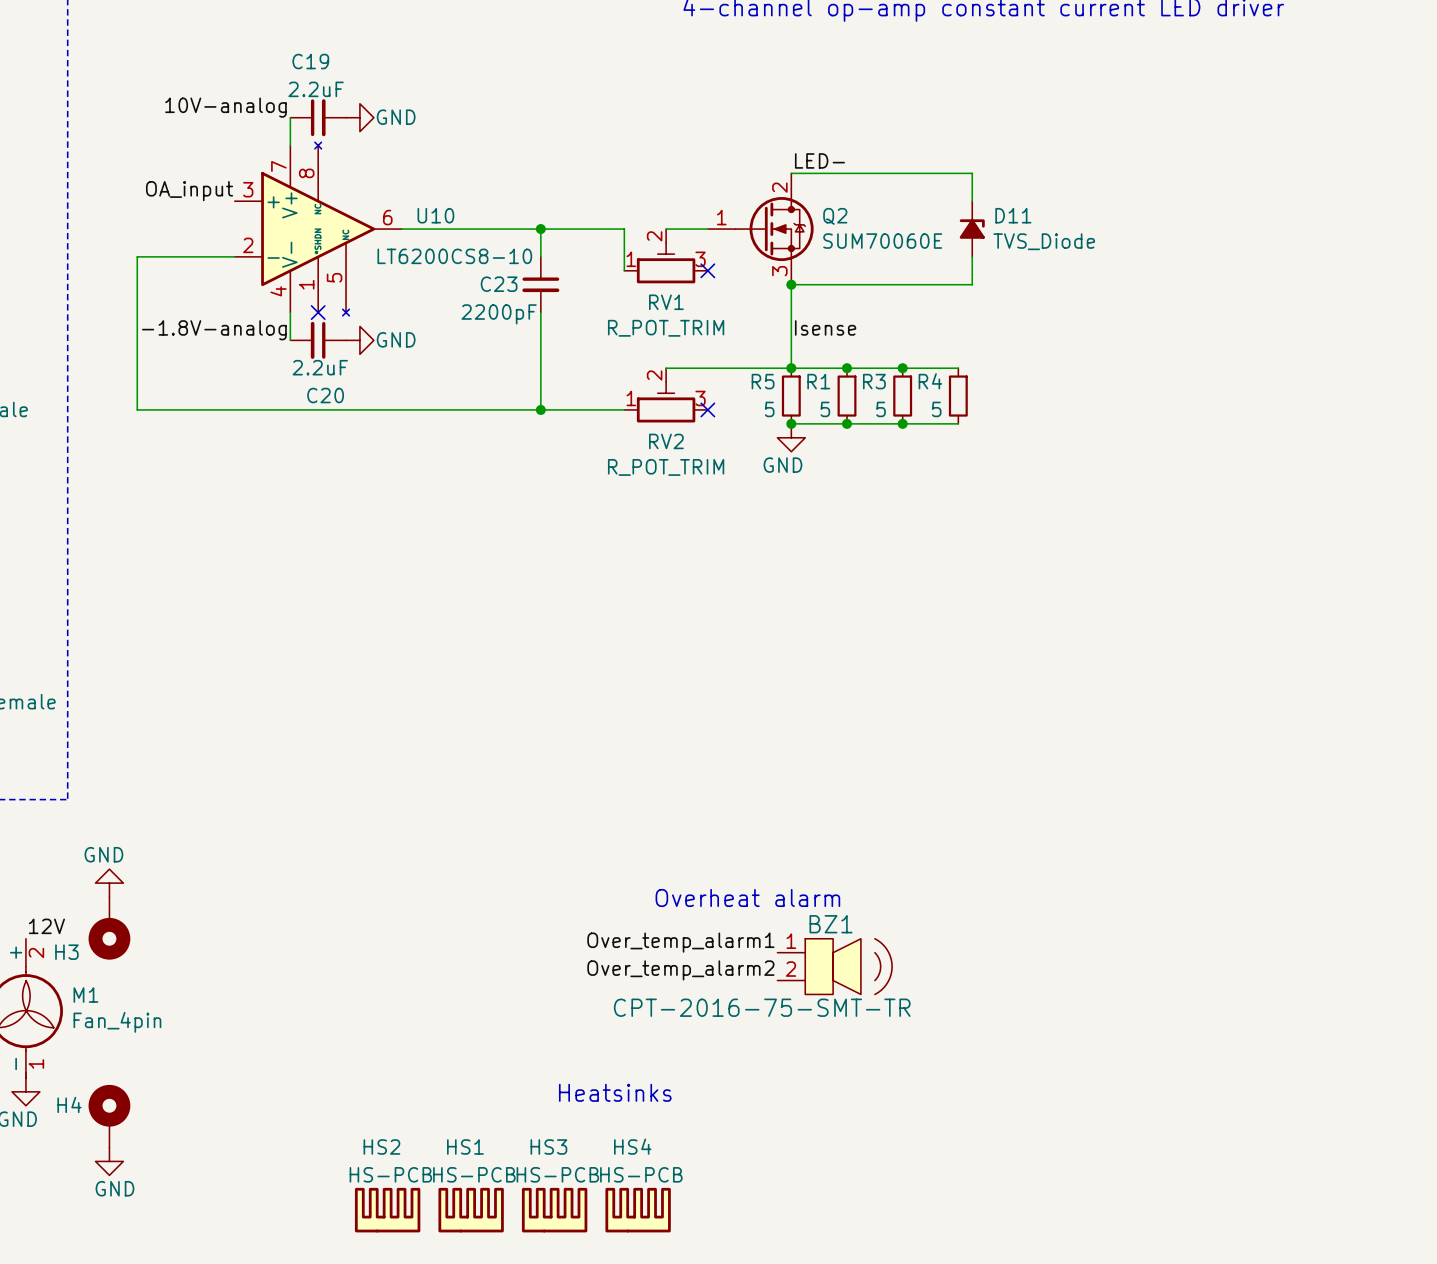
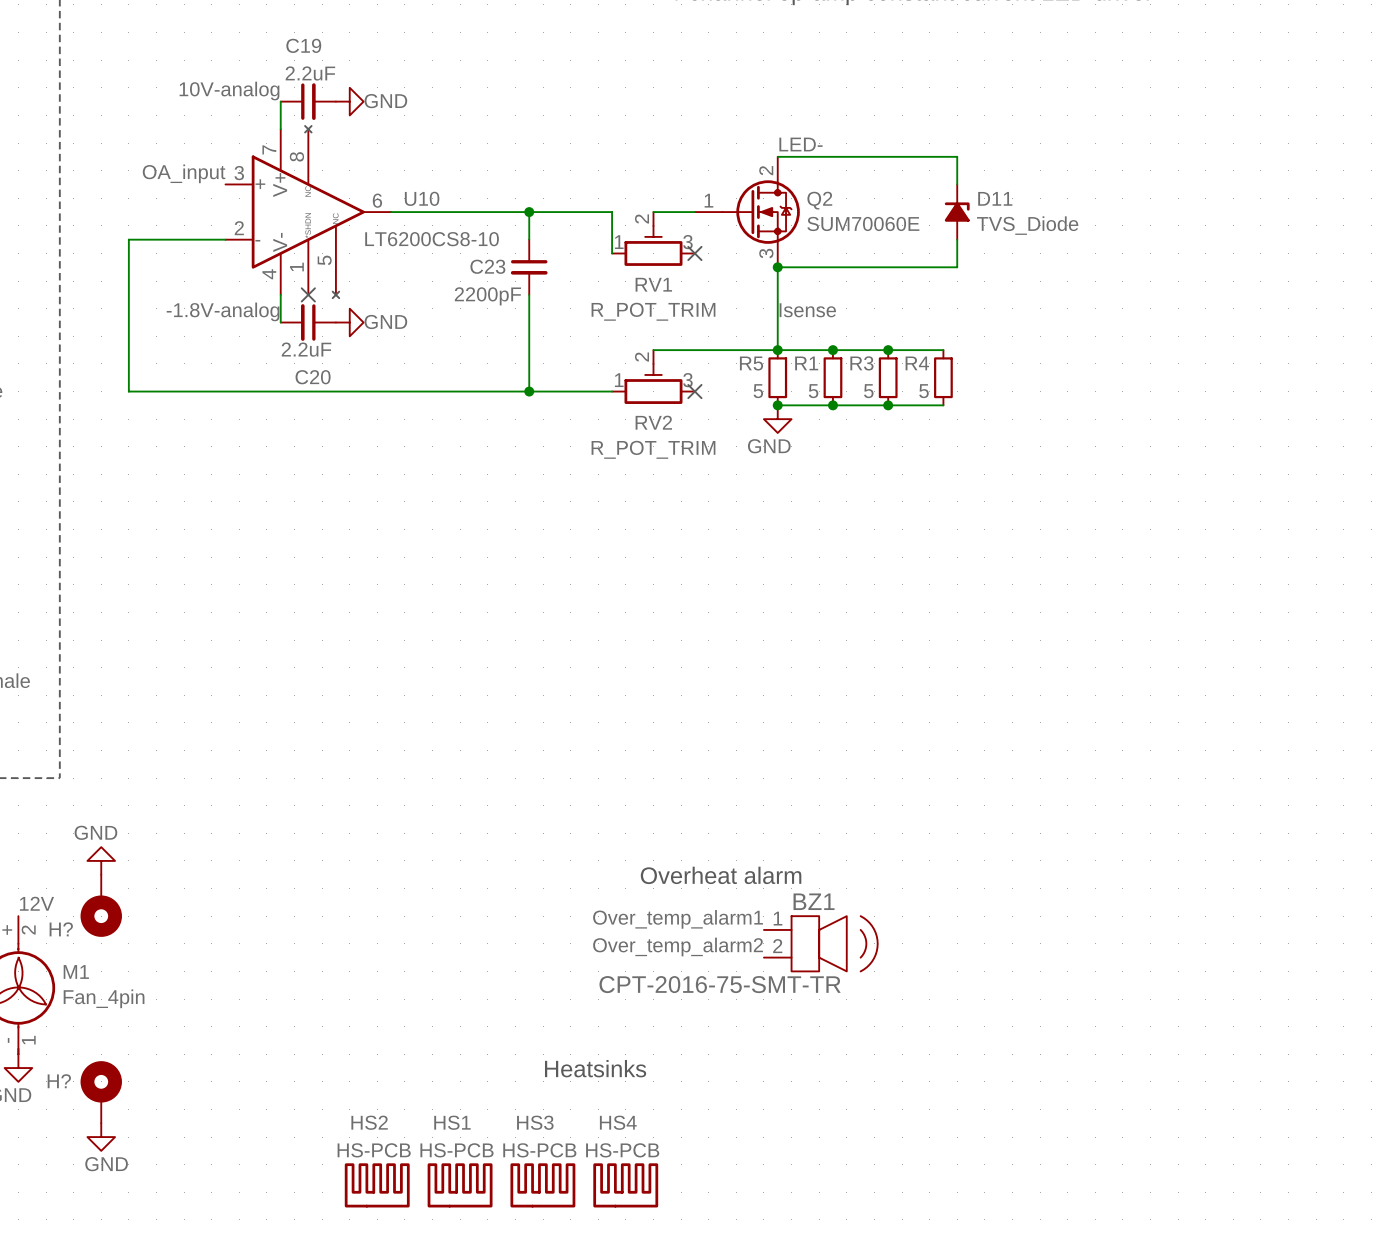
H3 name: H3 (66, 952) -> H? (61, 929)
H4 name: H4 (69, 1104) -> H? (59, 1081)

